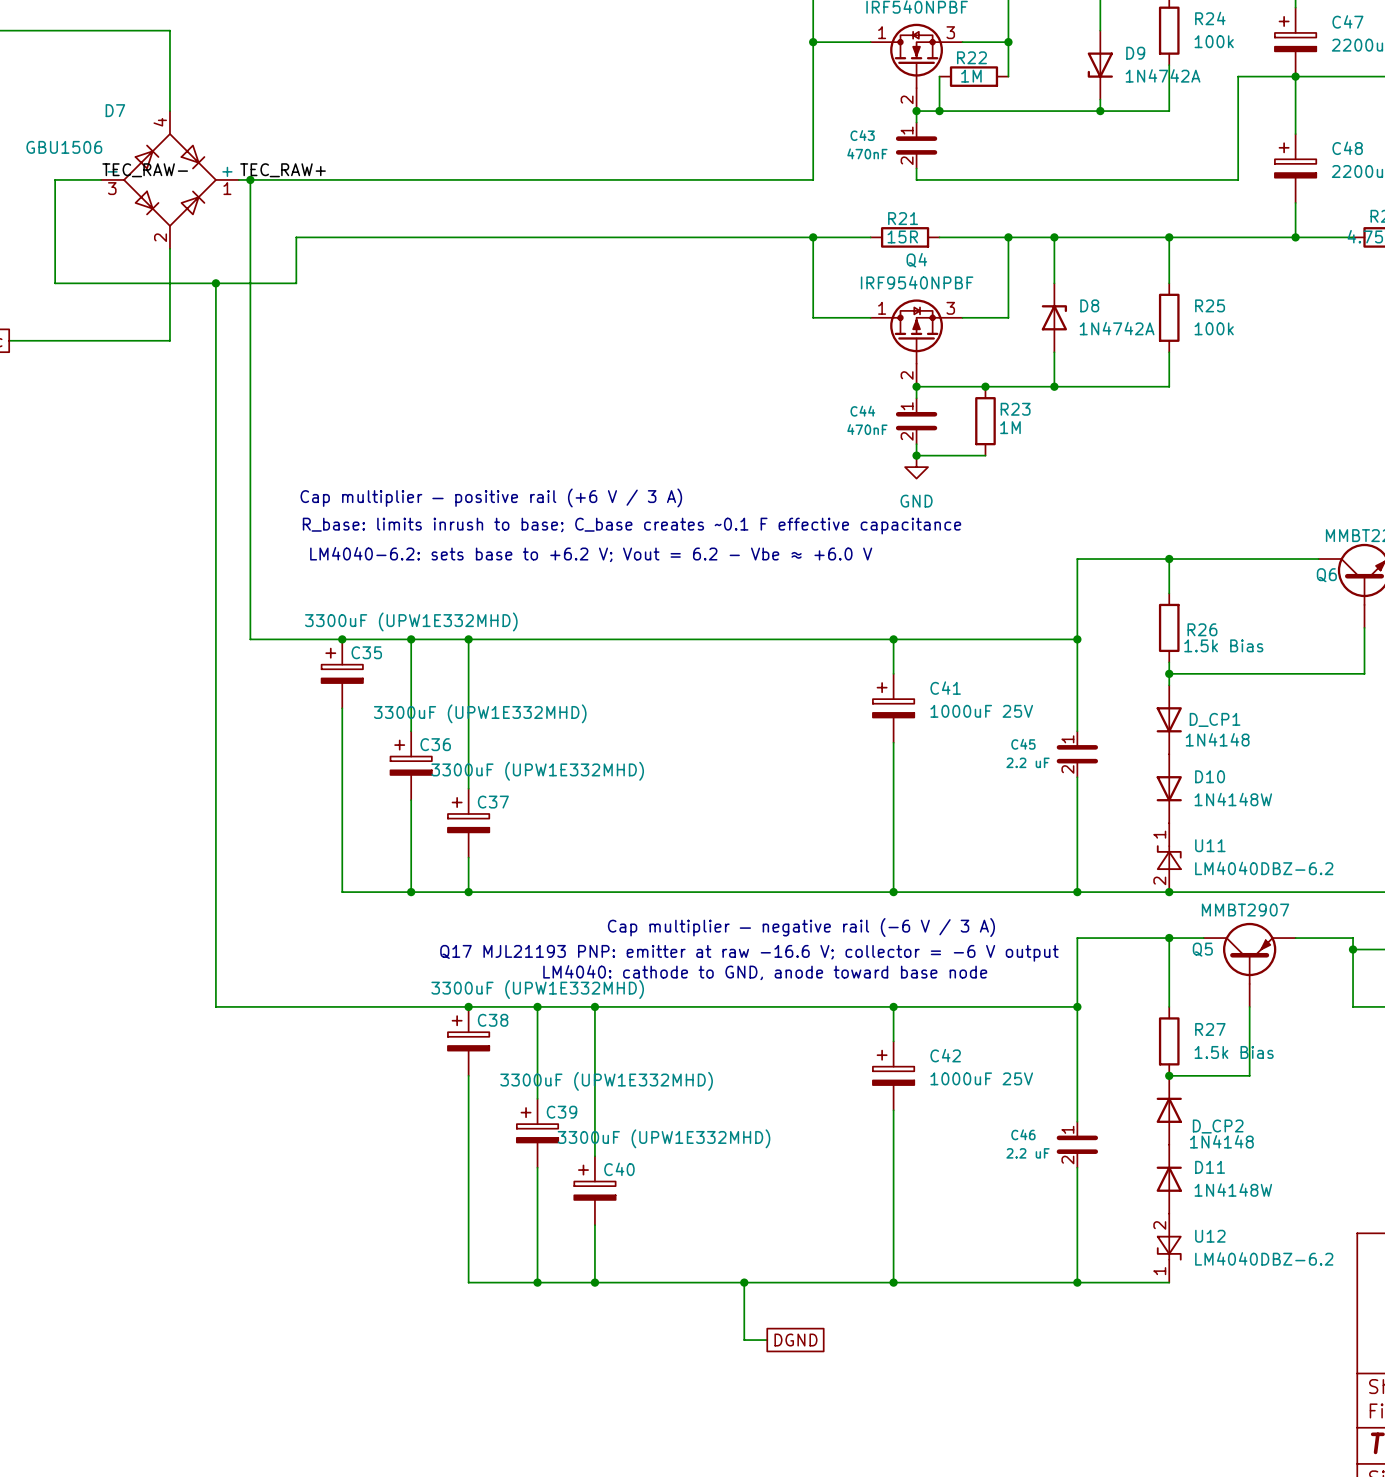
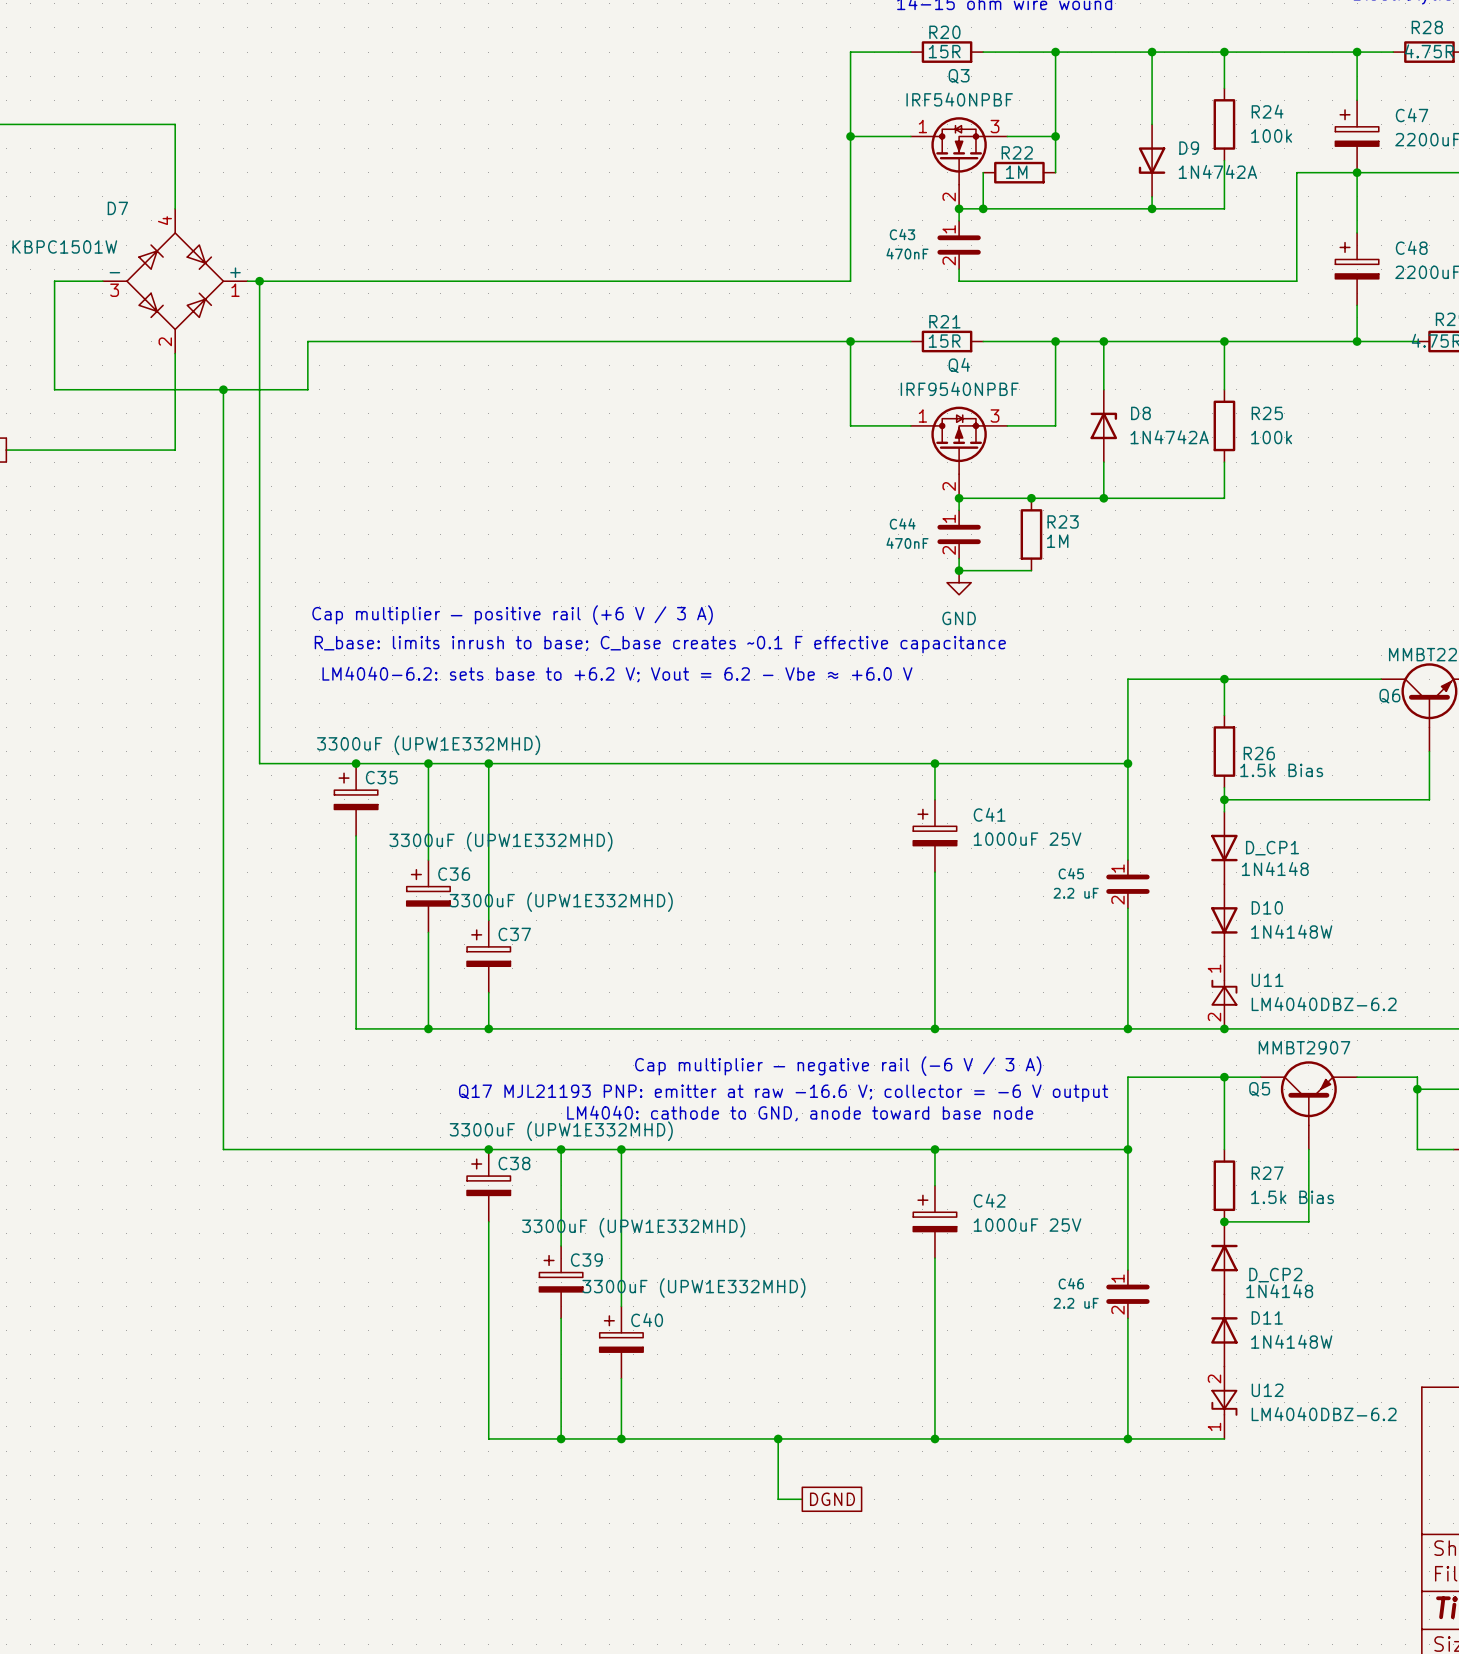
D7 value: GBU1506 (64, 147) -> KBPC1501W (64, 246)
label: TEC_RAW- (145, 170) -> none
label: TEC_RAW+ (283, 170) -> none

